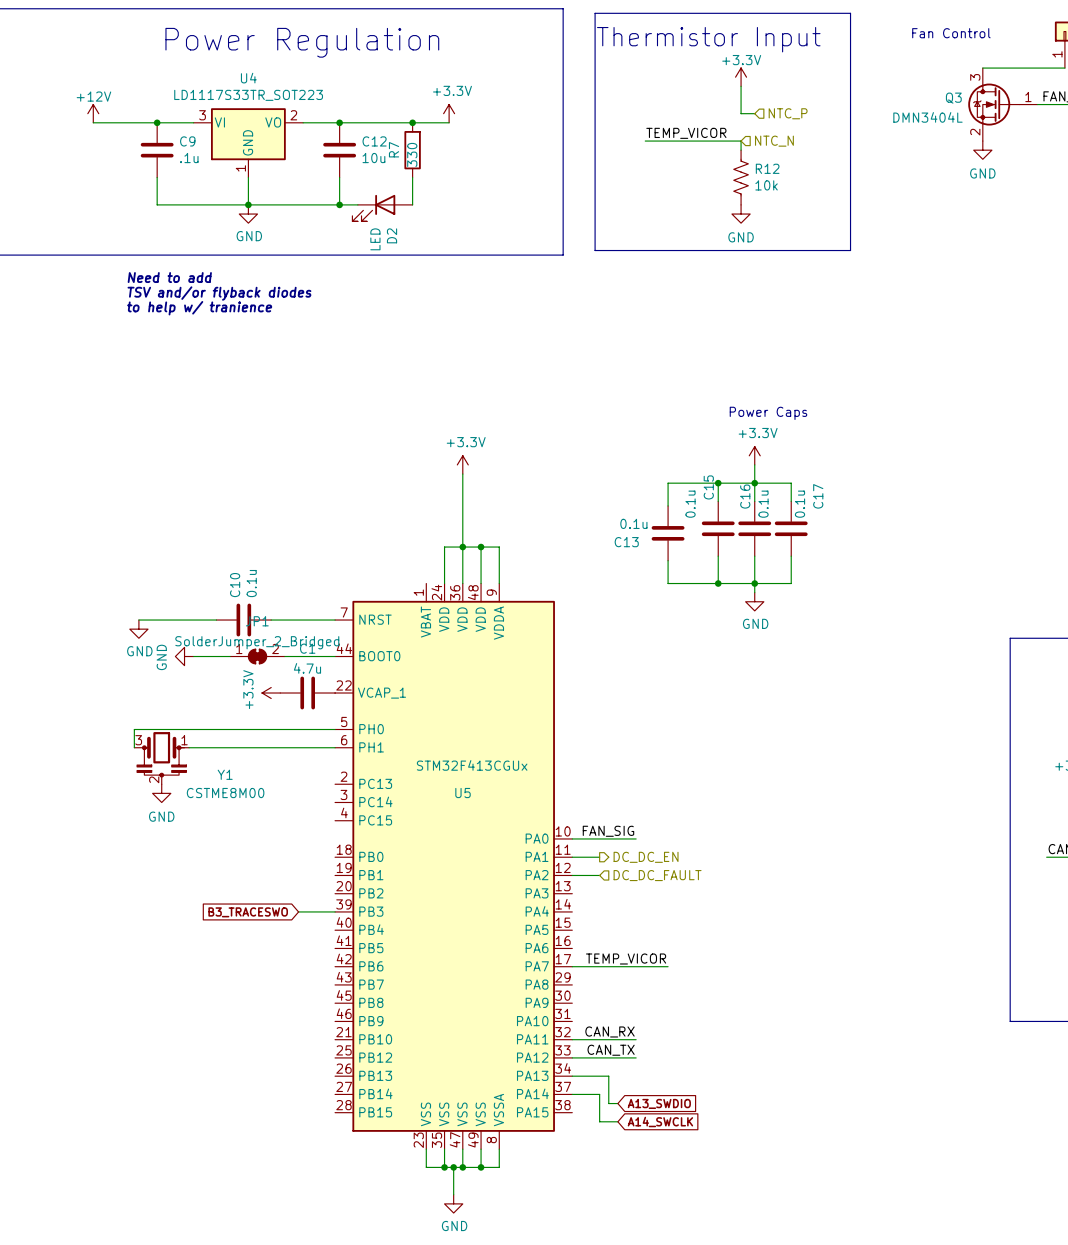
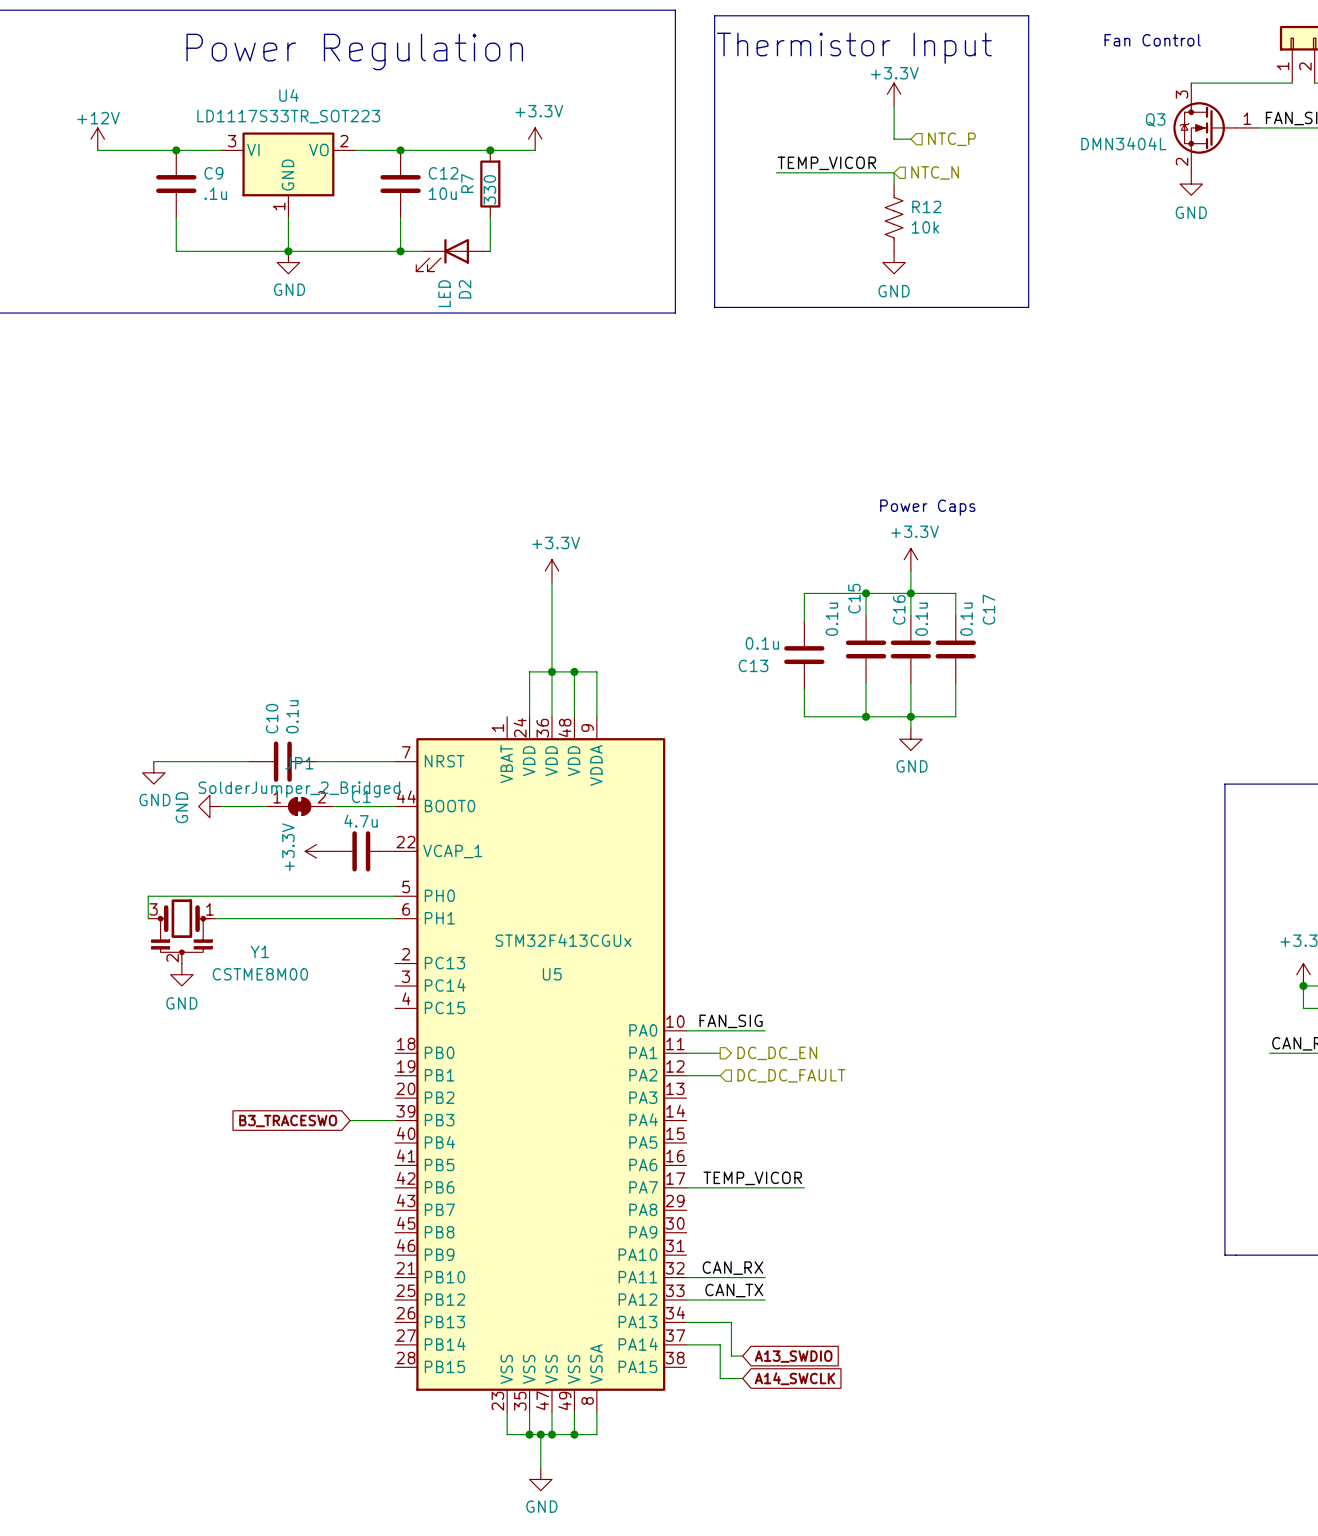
text: Need to add (169, 277) -> none
text: TSV and/or flyback diodes (219, 293) -> none
text: to help w/ tranience (199, 308) -> none

